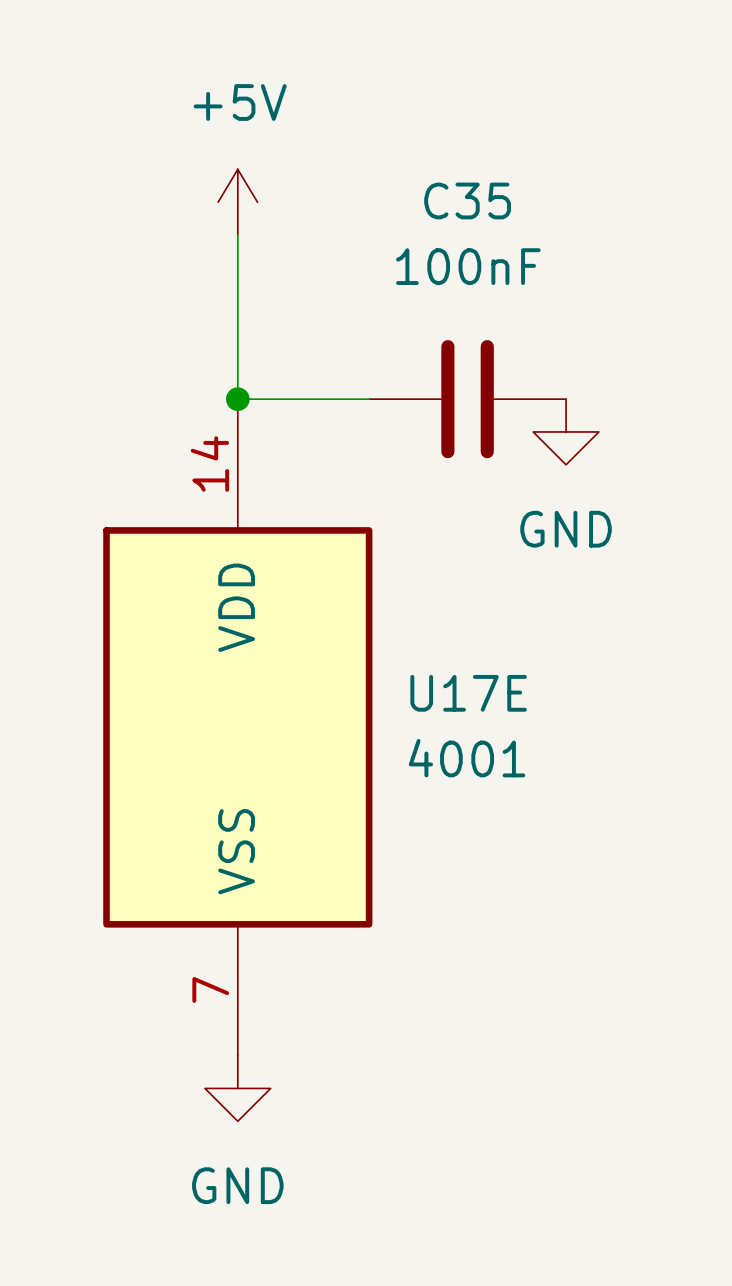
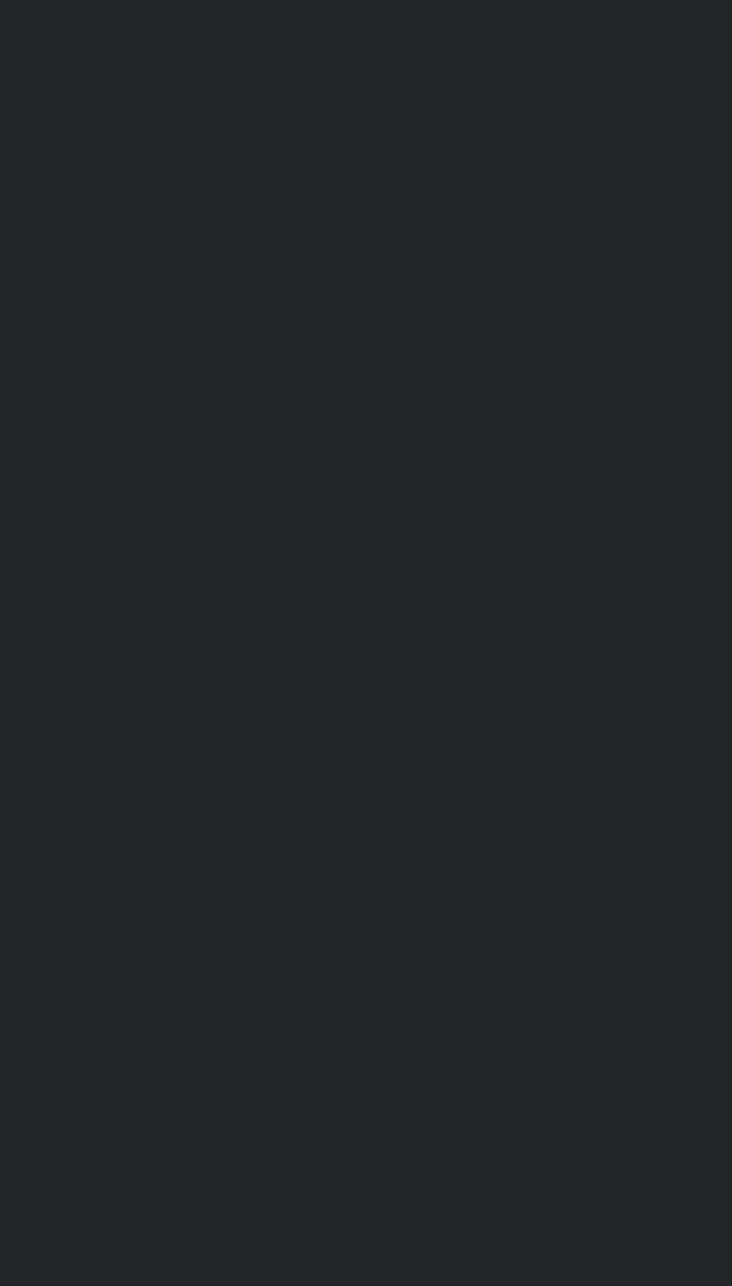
power symbol: +5V (237, 202) -> none
wire: (237, 235) (237, 399) (369, 399) -> none
junction: (237, 399) -> none
C35: 100nF (467, 399) -> none
power symbol: GND (566, 431) -> none
U17E: 4001 (237, 727) -> none
power symbol: GND (237, 1088) -> none

